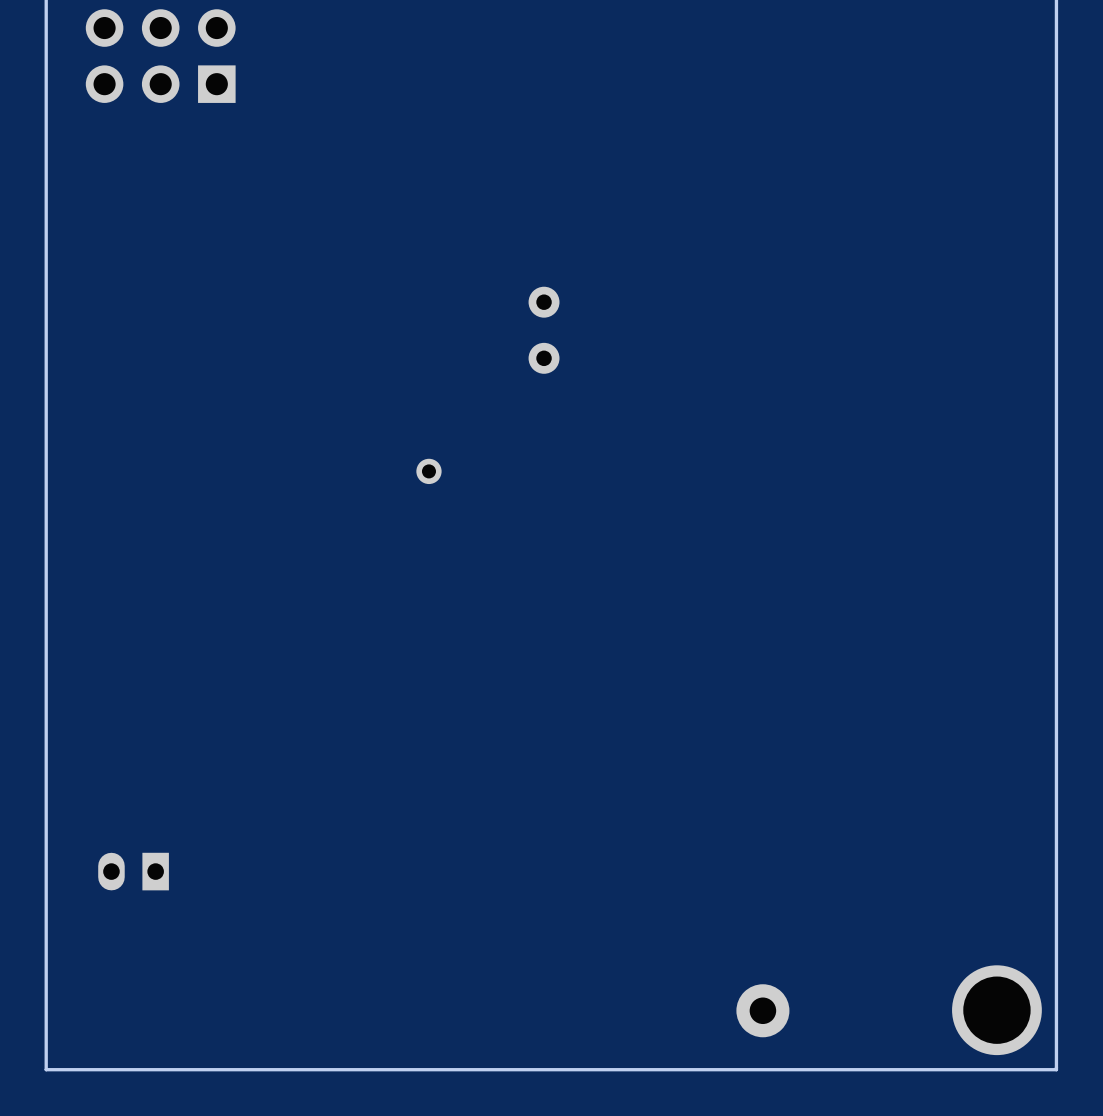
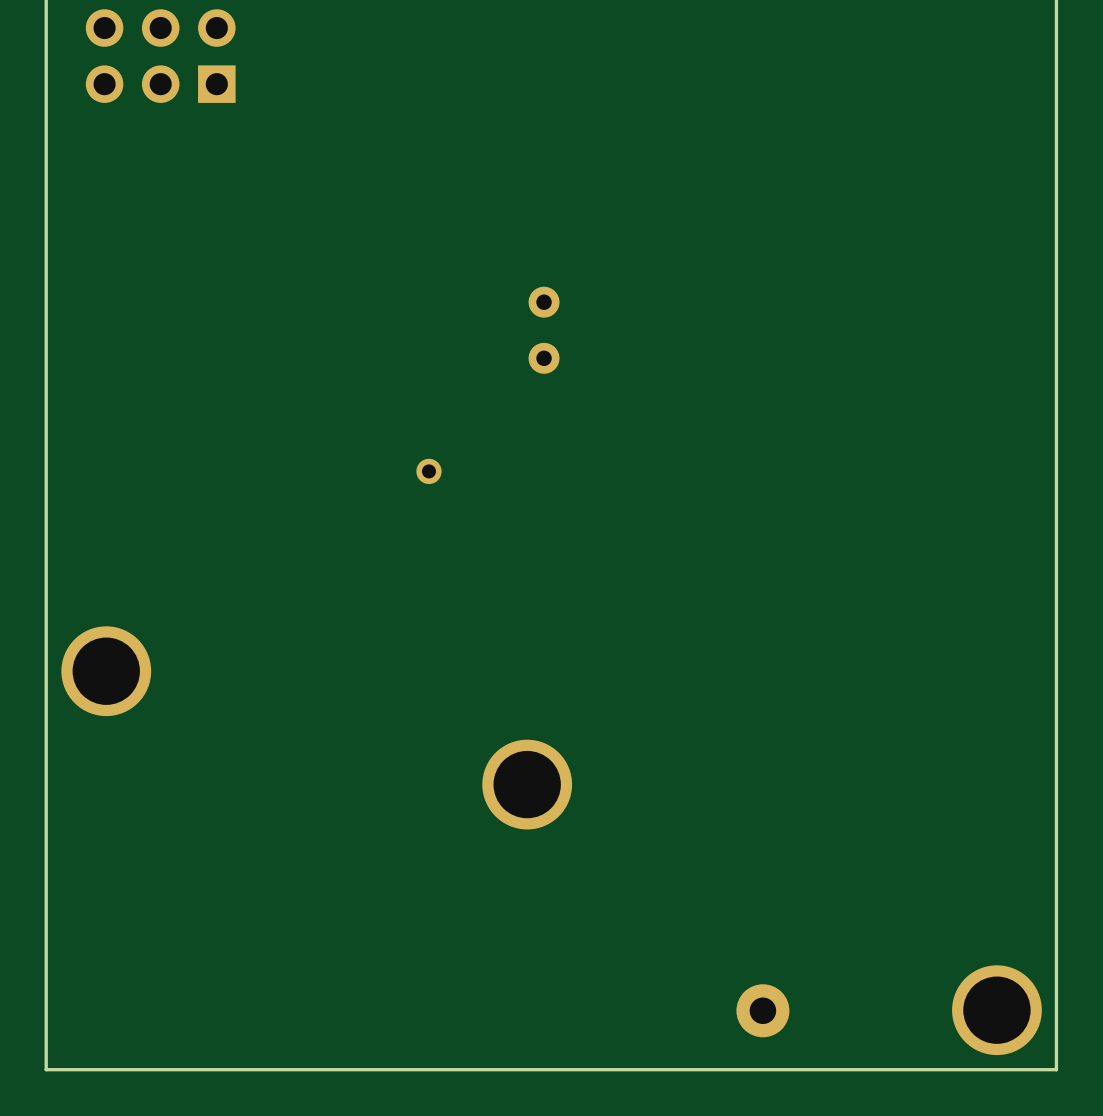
part: none -> (106, 671)
part: none -> (527, 784)
part: (133, 871) -> none

